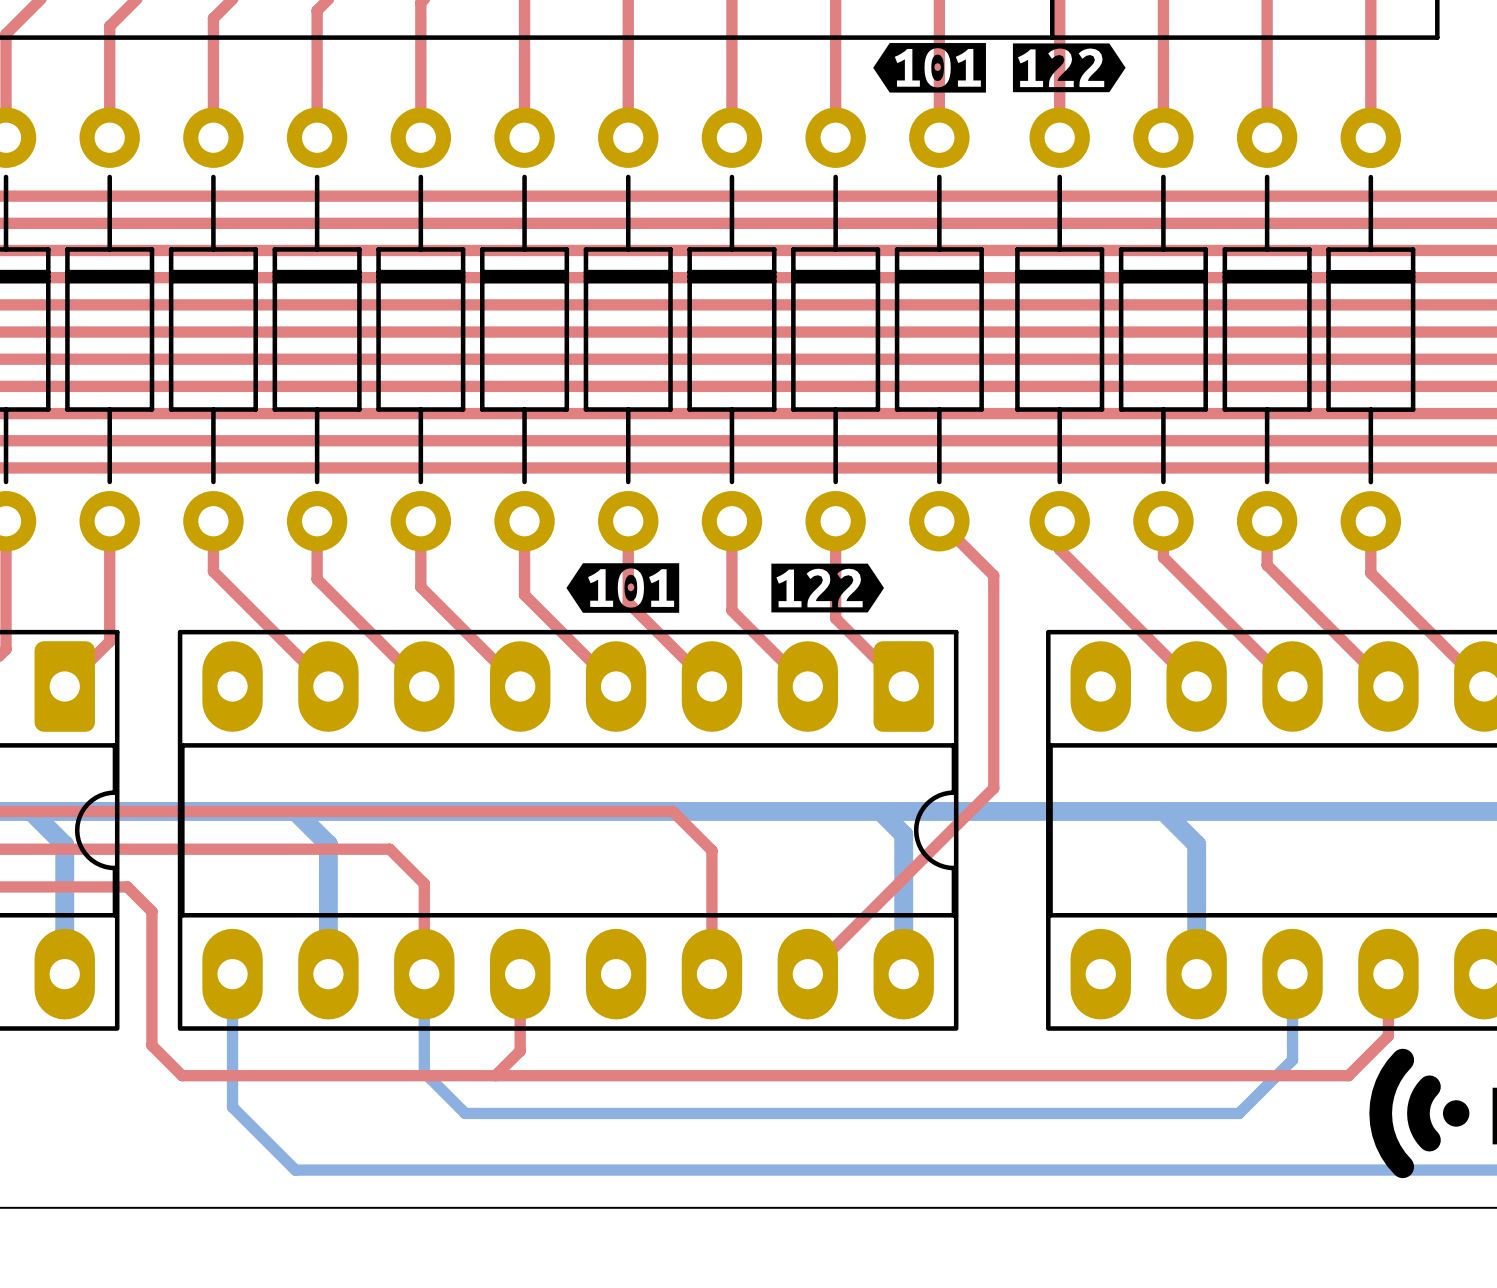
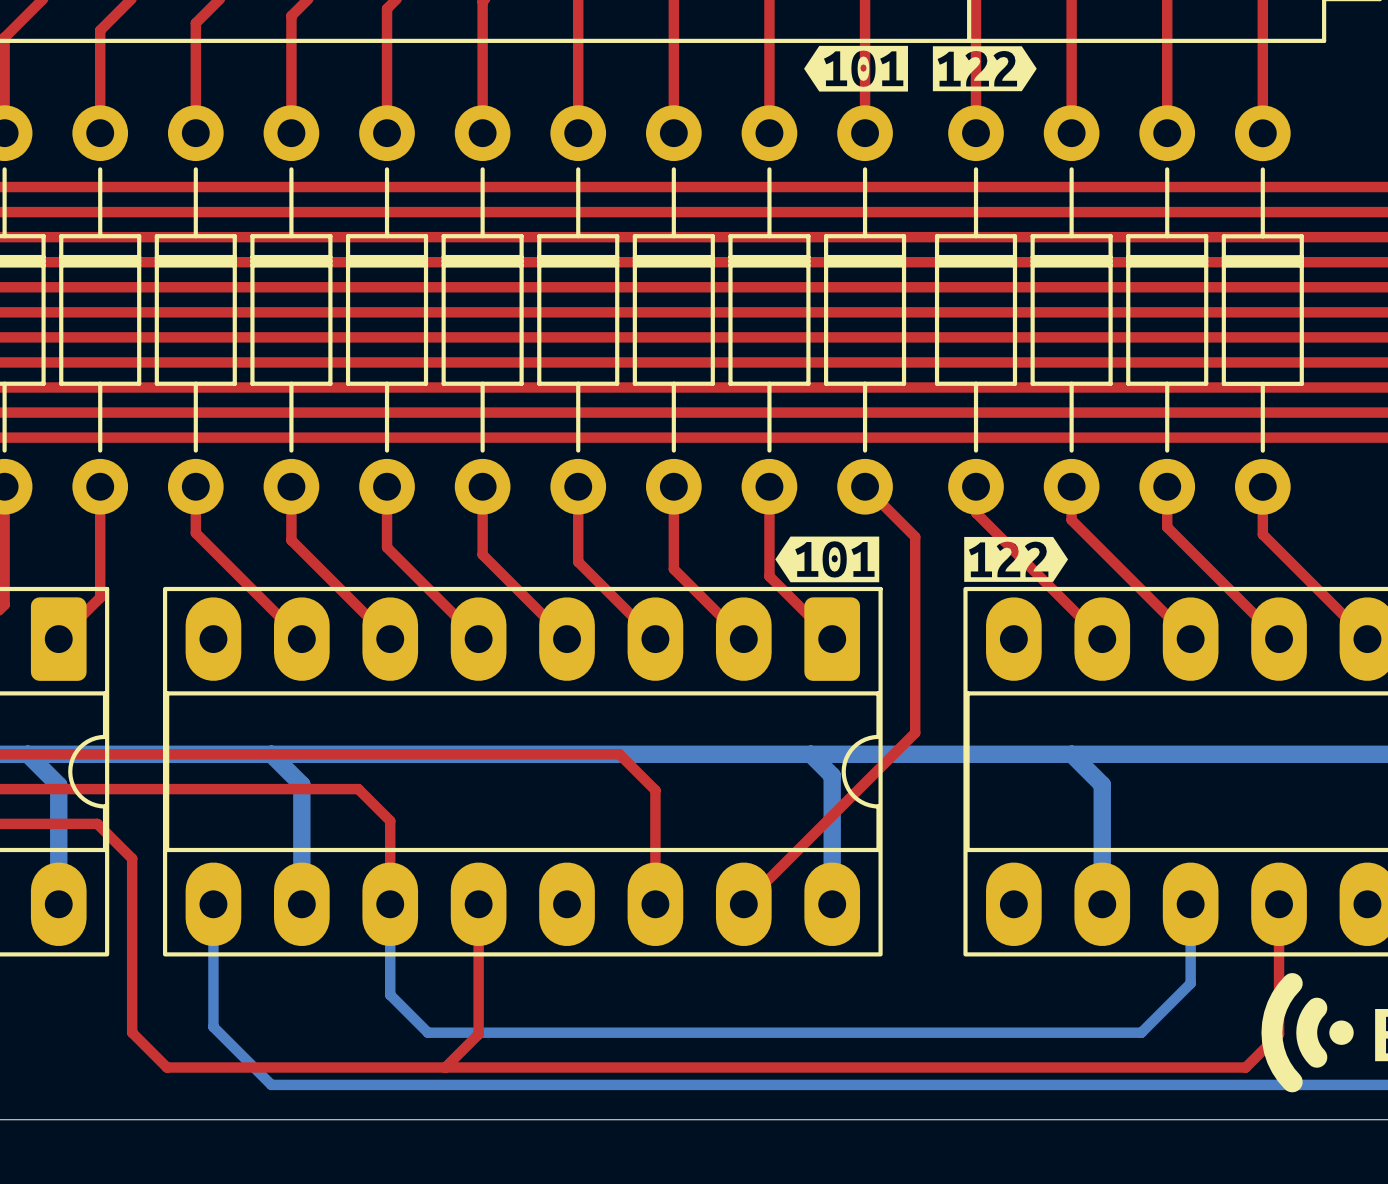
drawing position: (622, 588) -> (827, 559)
drawing position: (827, 588) -> (1016, 559)
top track: (106, 886) (127, 886) (151, 911) (151, 1045) (182, 1075) (1348, 1075) (1388, 1035) -> (97, 823) (132, 858) (132, 1032) (166, 1067) (1245, 1067) (1279, 1034) (1279, 961)
top track: (520, 1050) (495, 1075) -> (478, 975) (478, 1034) (445, 1067)

